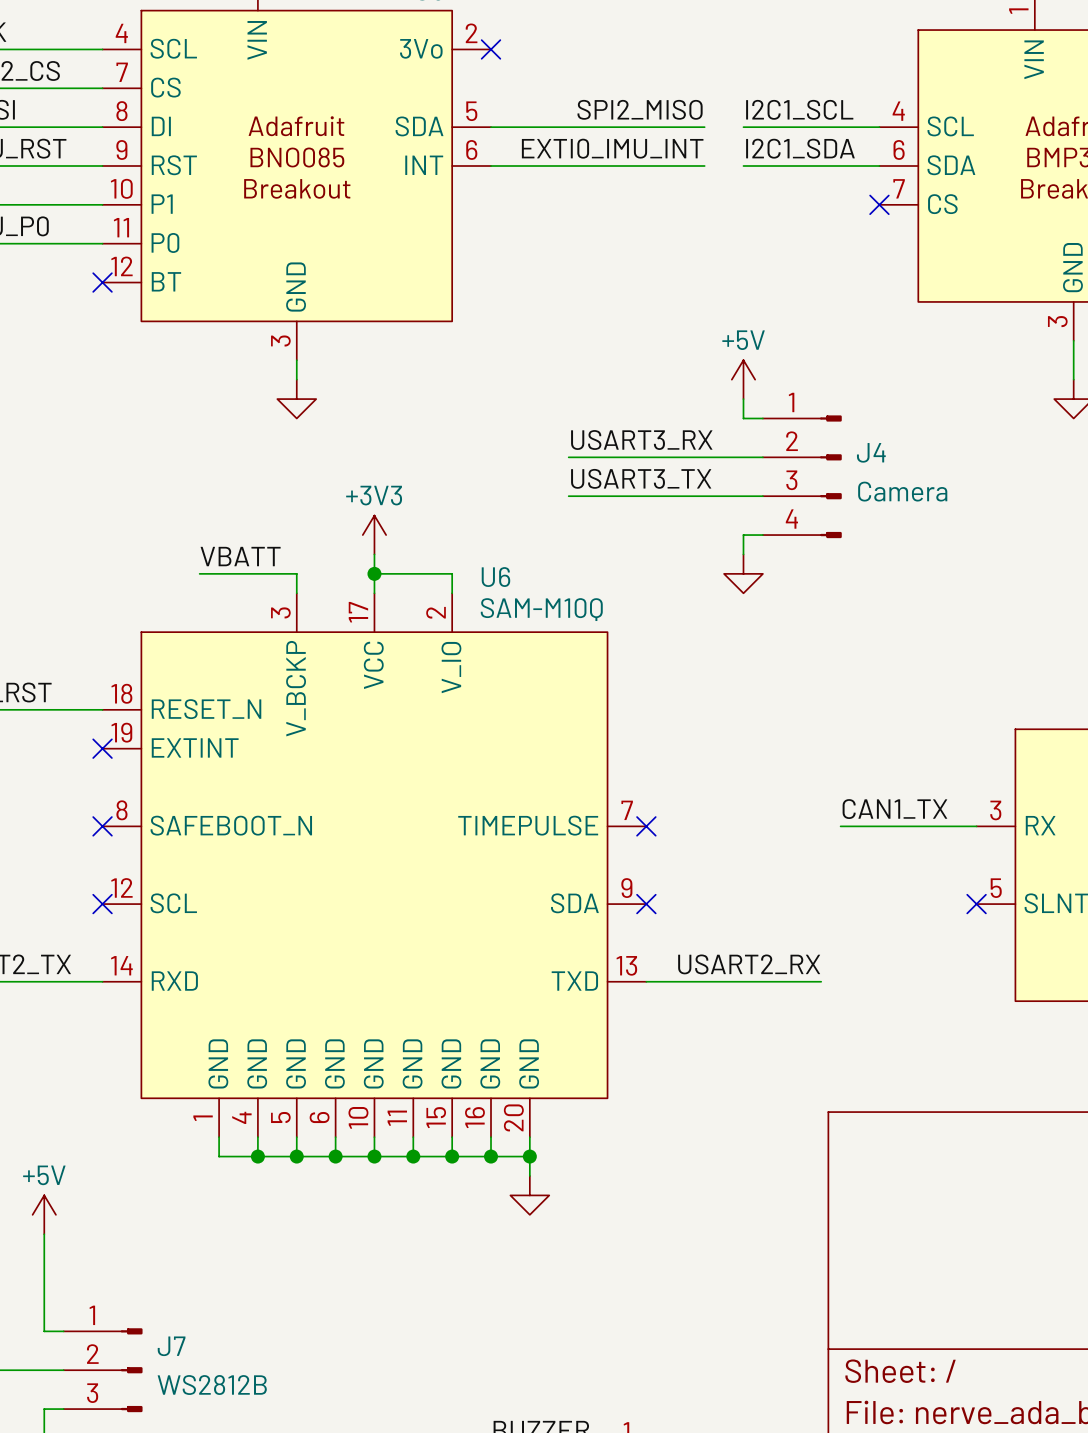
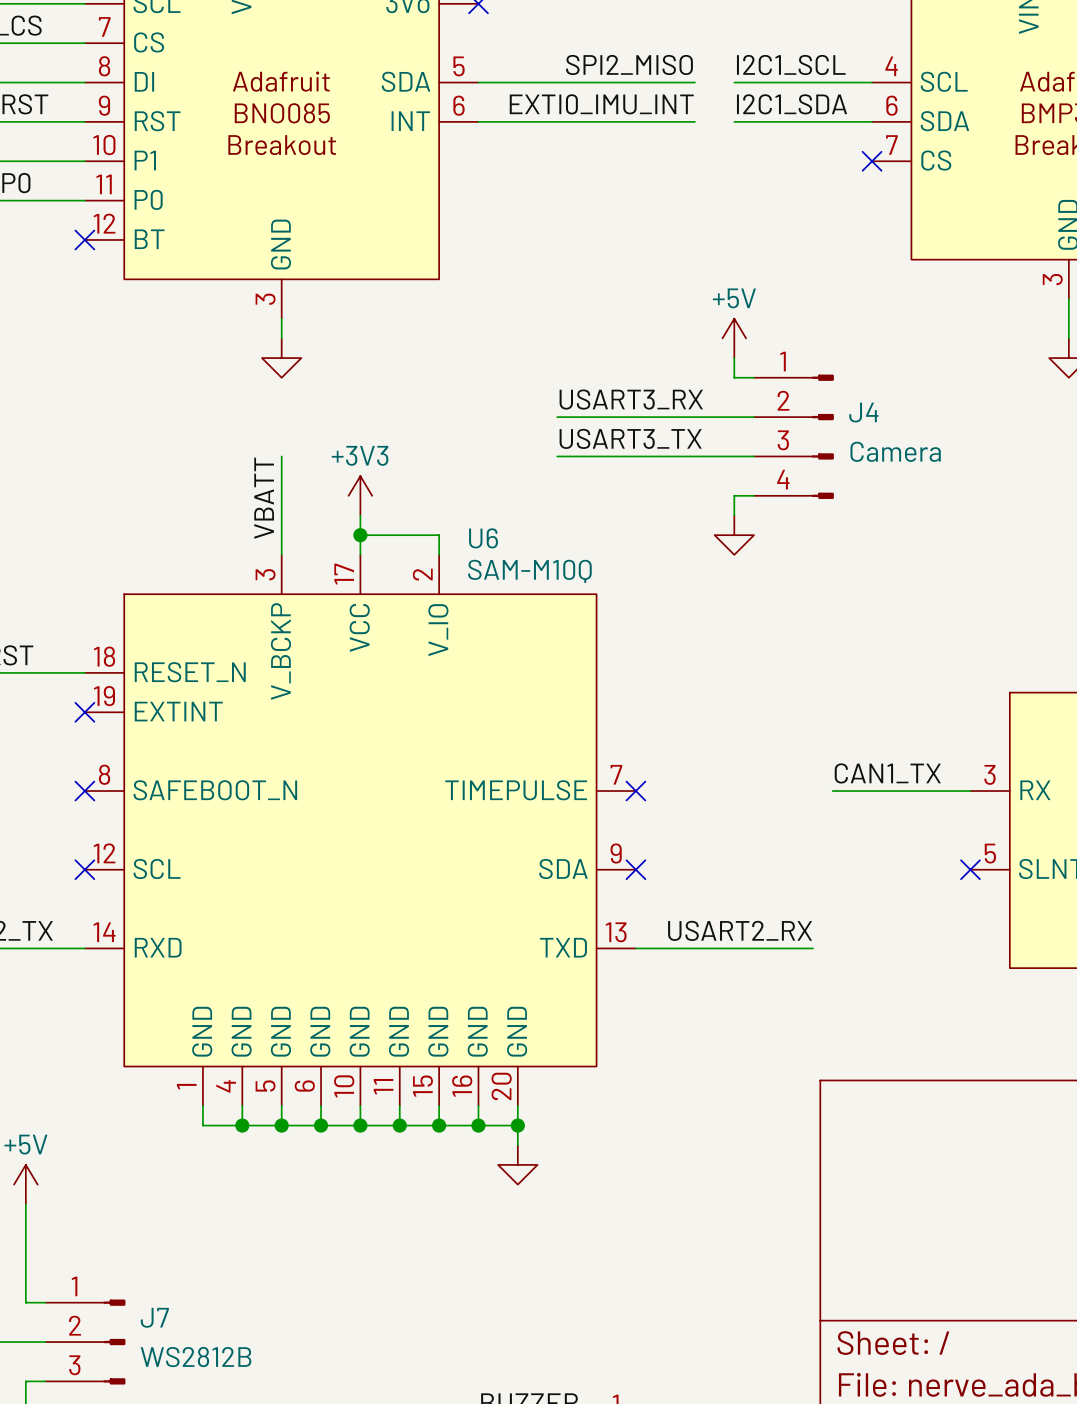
label rotation: 0° (240, 556) -> 90° counterclockwise (264, 498)
wire: (199, 573) (296, 573) -> (281, 456) (281, 535)

